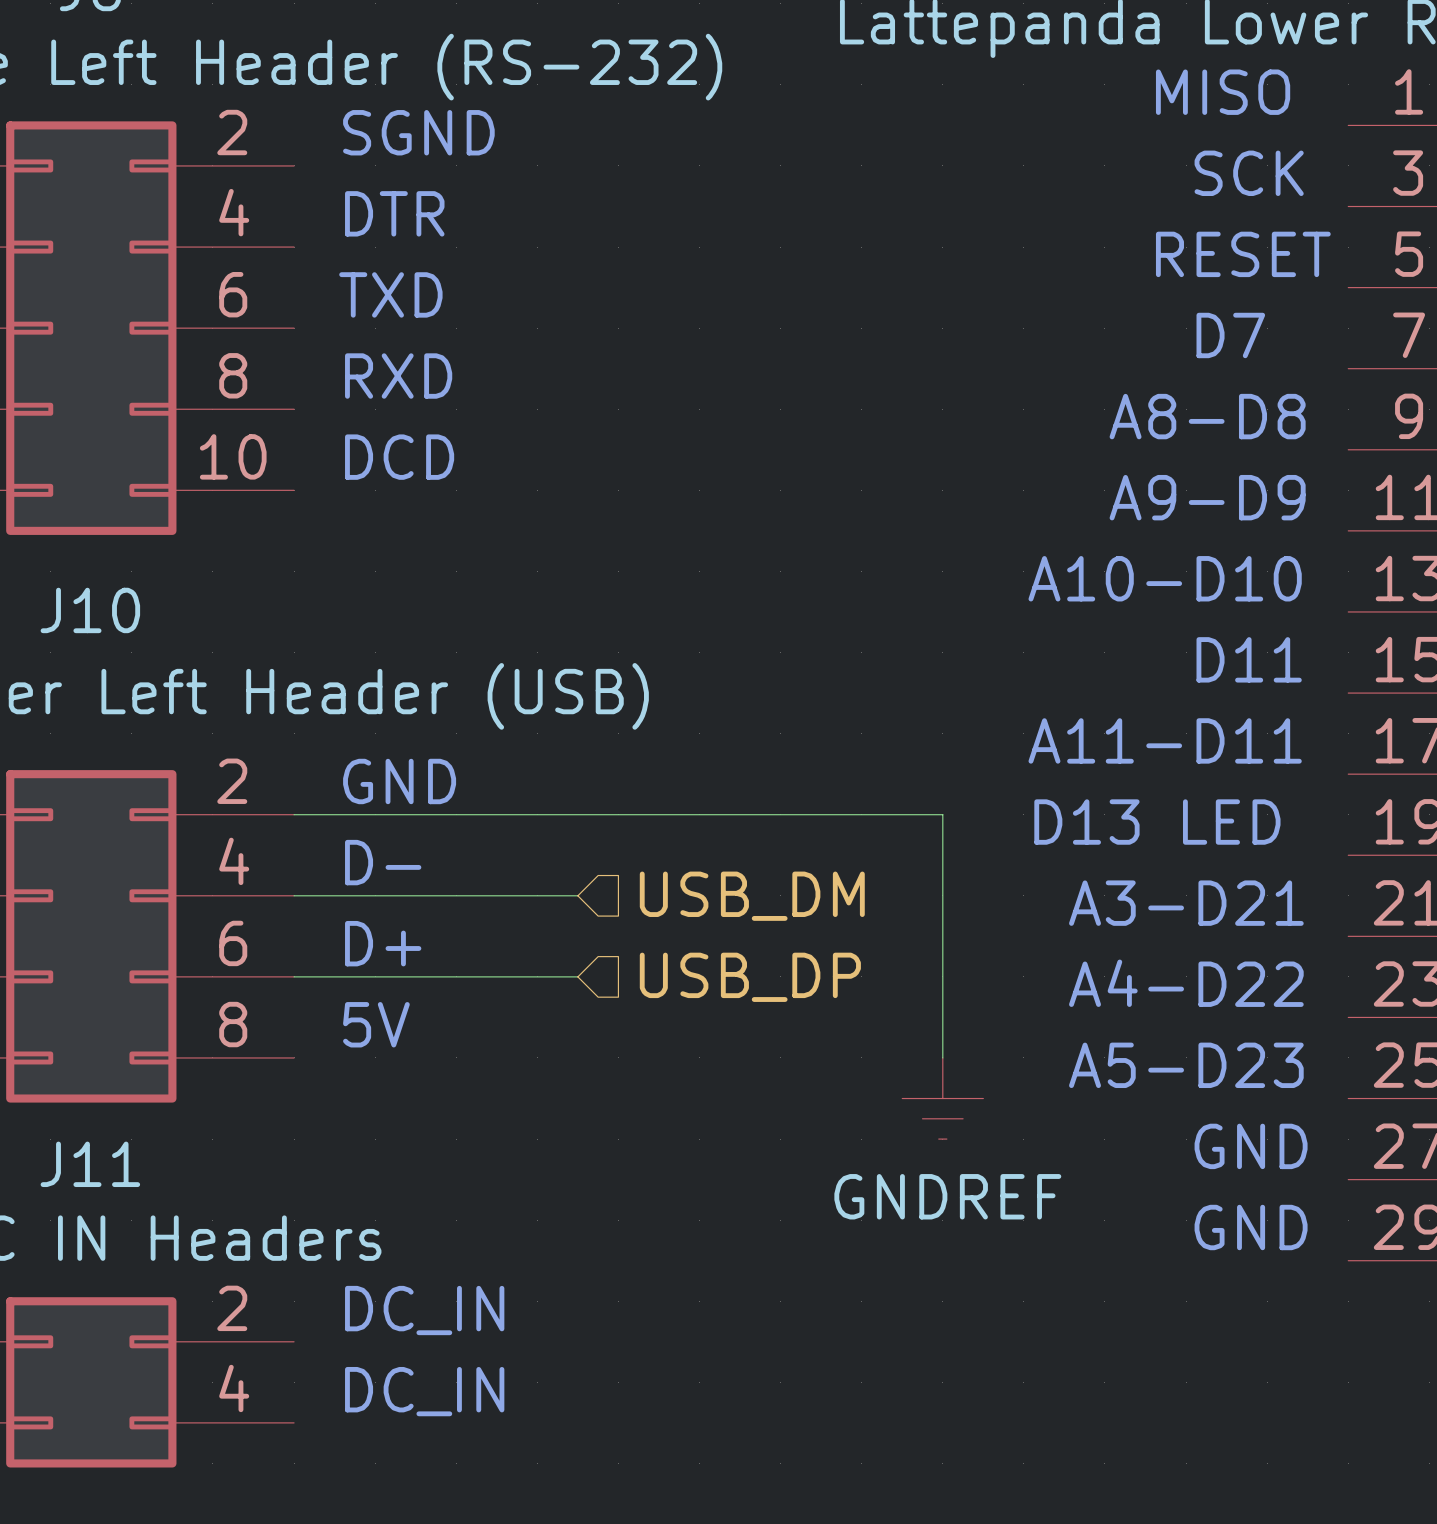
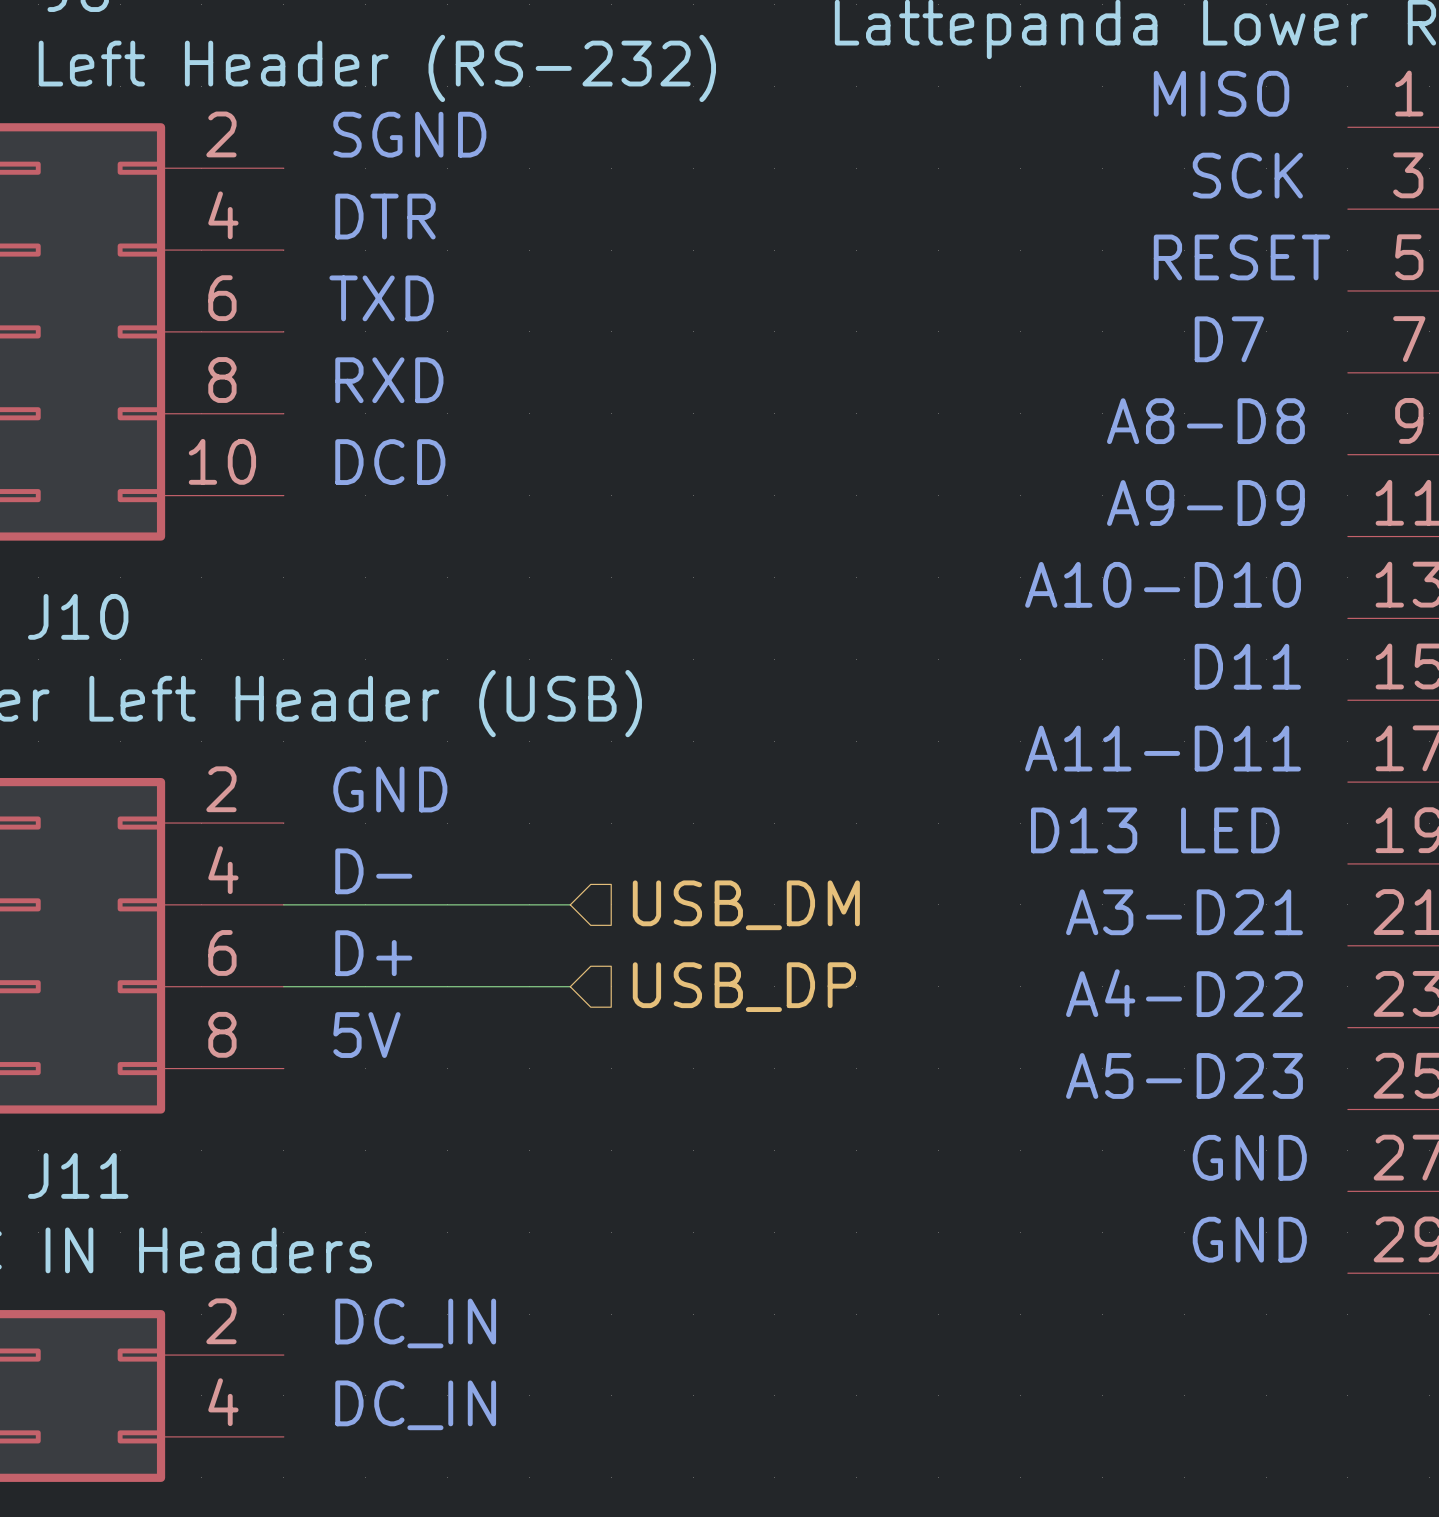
wire: (294, 814) (942, 814) (942, 1057) -> none
power symbol: GNDREF (942, 1098) -> none

